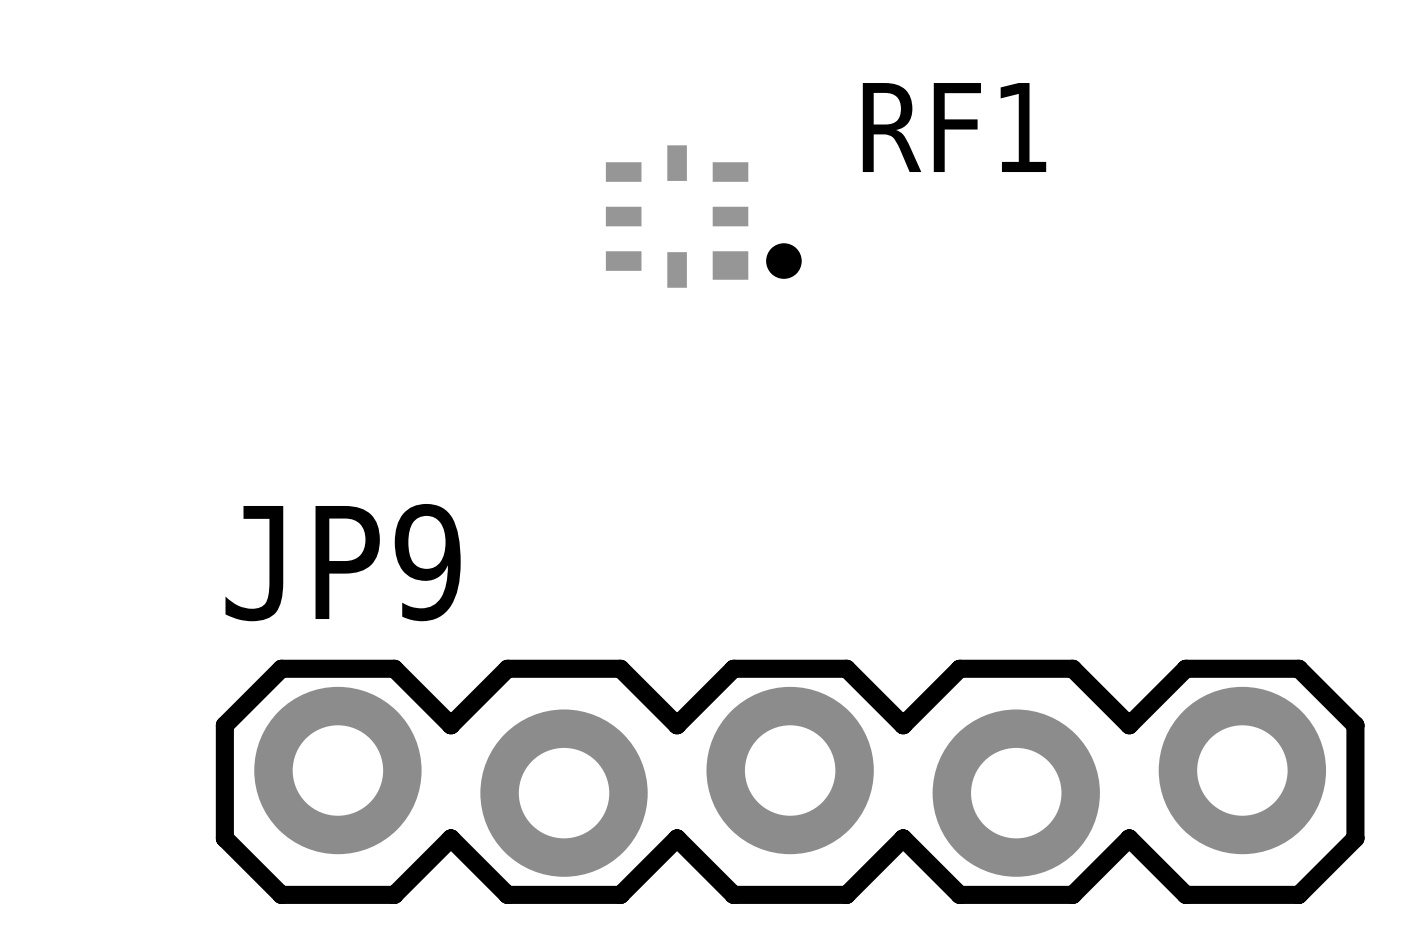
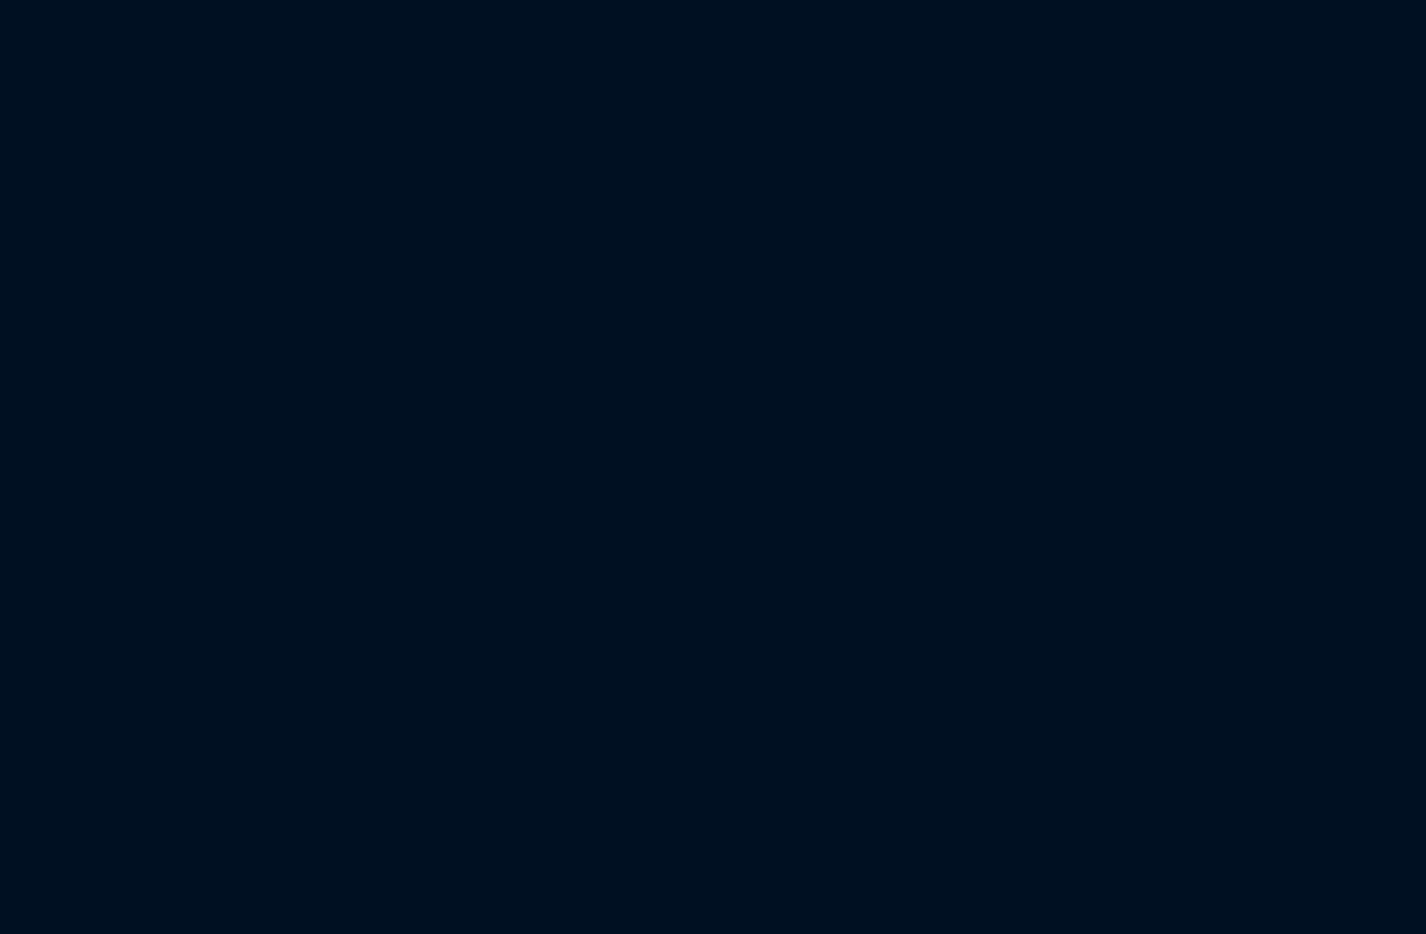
RF1: (703, 216) -> none
JP9: (790, 781) -> none

